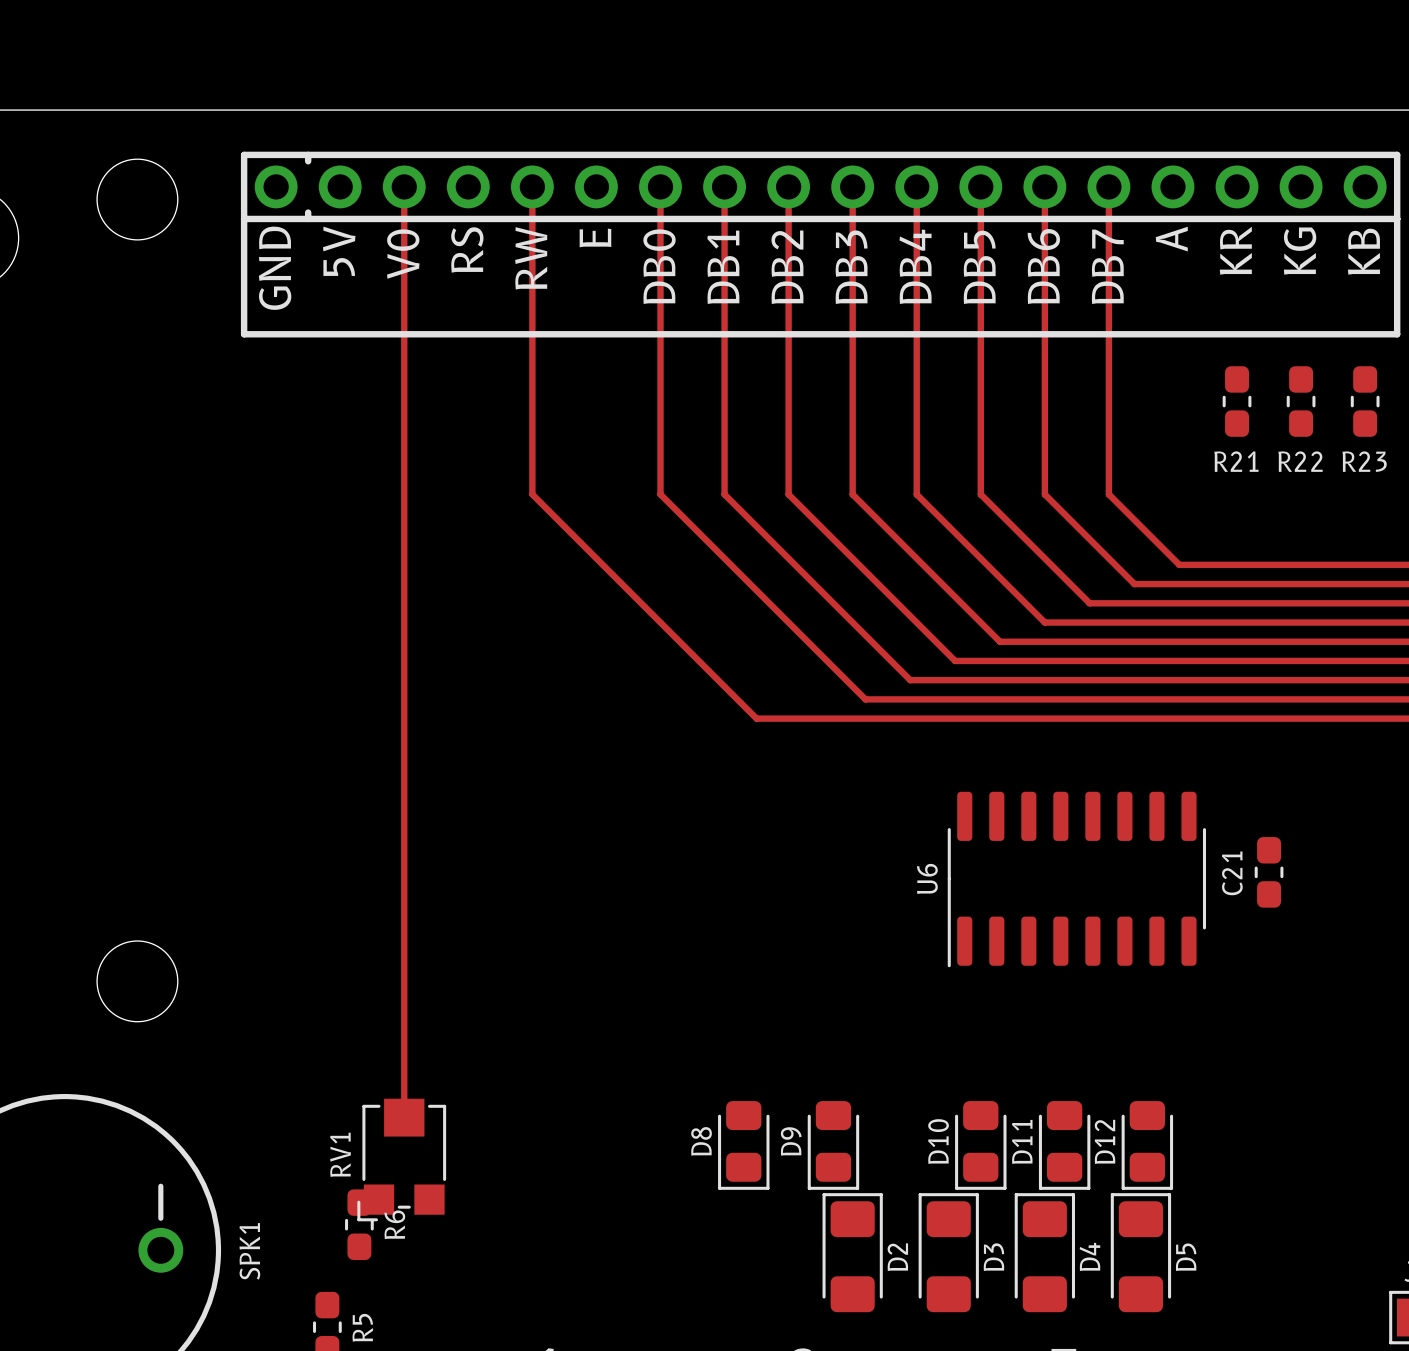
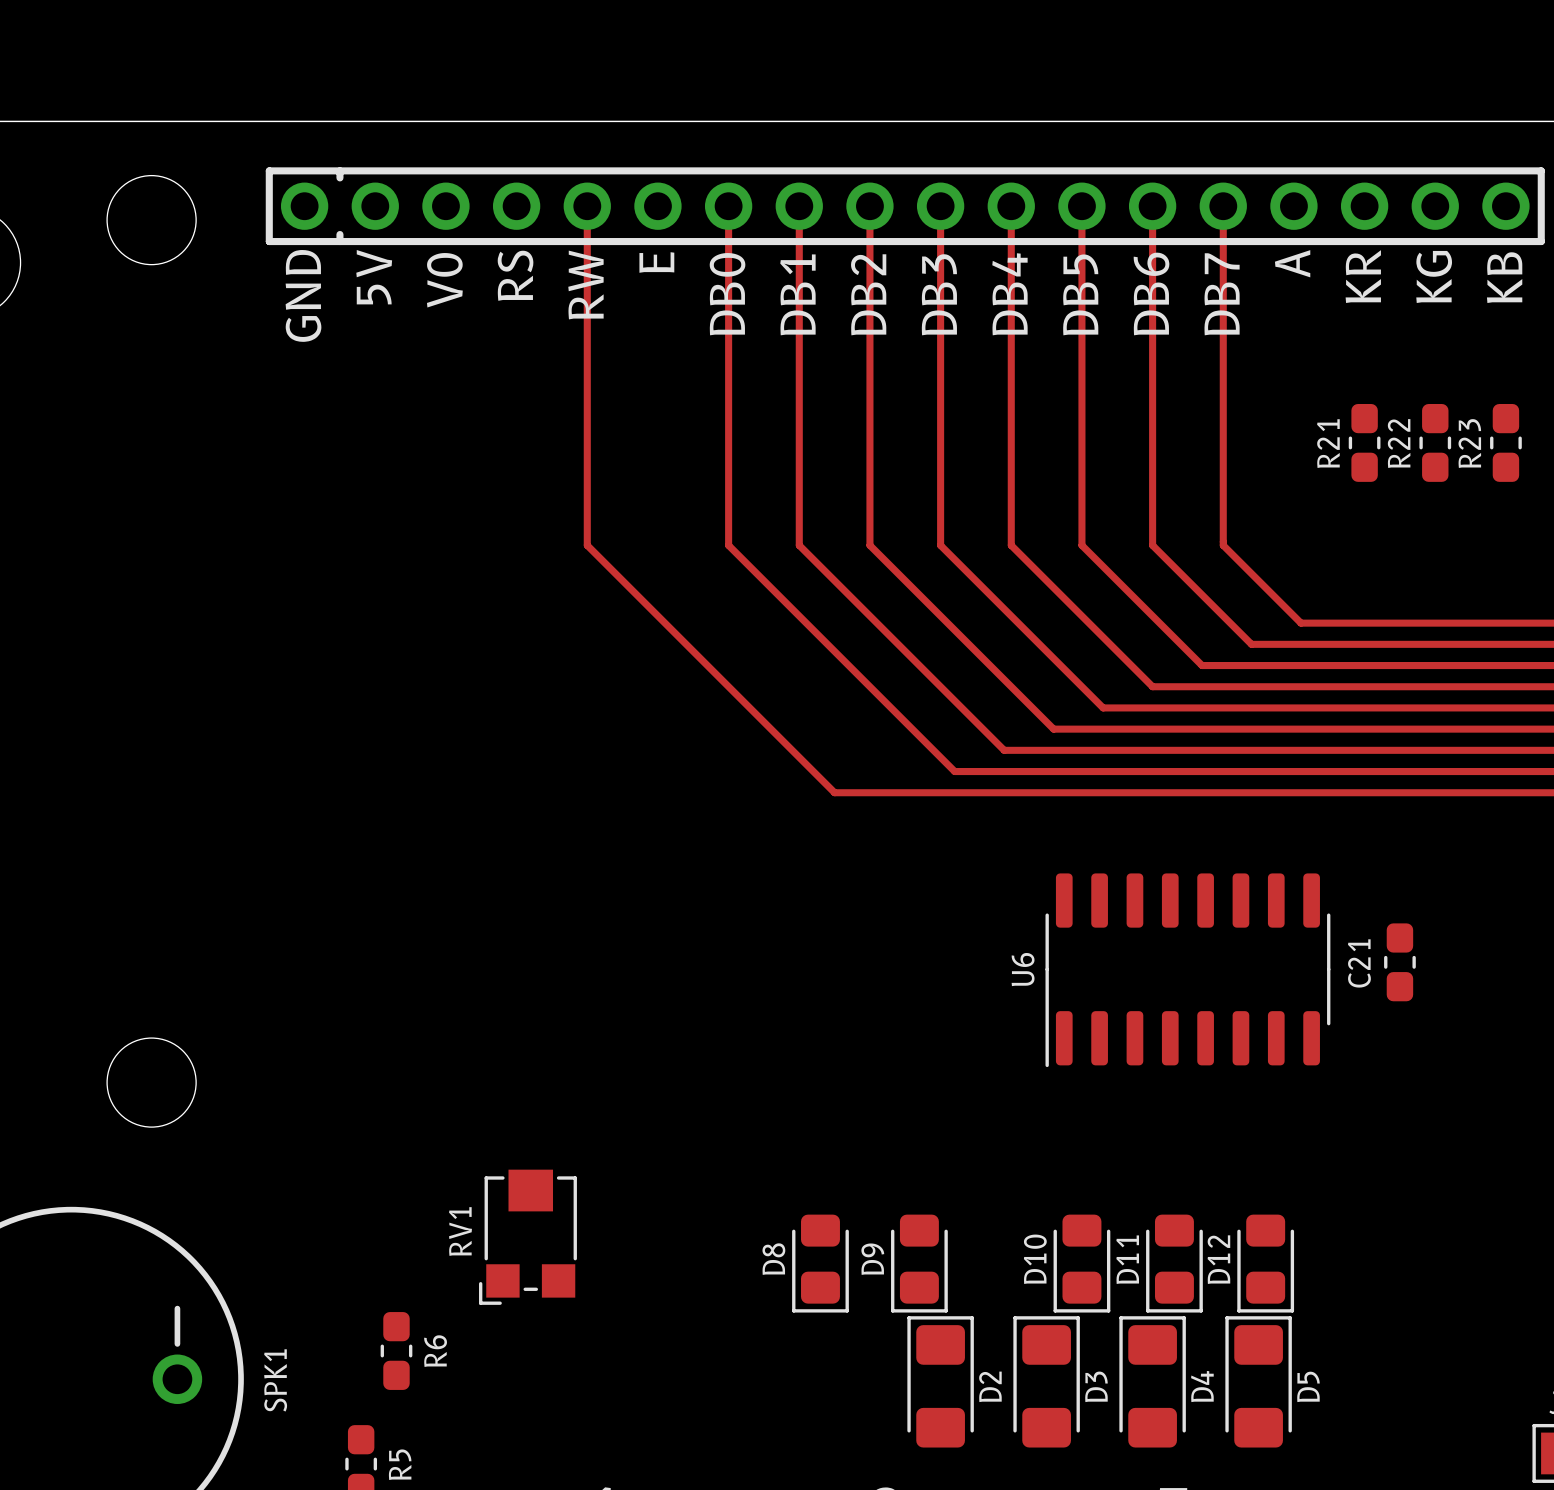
track: (404, 186) (404, 1117) -> none
line: (244, 218) (244, 334) (1397, 334) (1397, 218) -> none
R21 name rotation: 0° (1236, 461) -> 90° counterclockwise (1328, 443)
R21 name position: R21 (1236, 461) -> R21 (1328, 443)
R22 name rotation: 0° (1300, 461) -> 90° counterclockwise (1399, 443)
R22 name position: R22 (1300, 461) -> R22 (1399, 443)
R23 name rotation: 0° (1364, 461) -> 90° counterclockwise (1469, 443)
R23 name position: R23 (1364, 461) -> R23 (1469, 443)
RV1 position: (401, 1160) -> (527, 1237)

